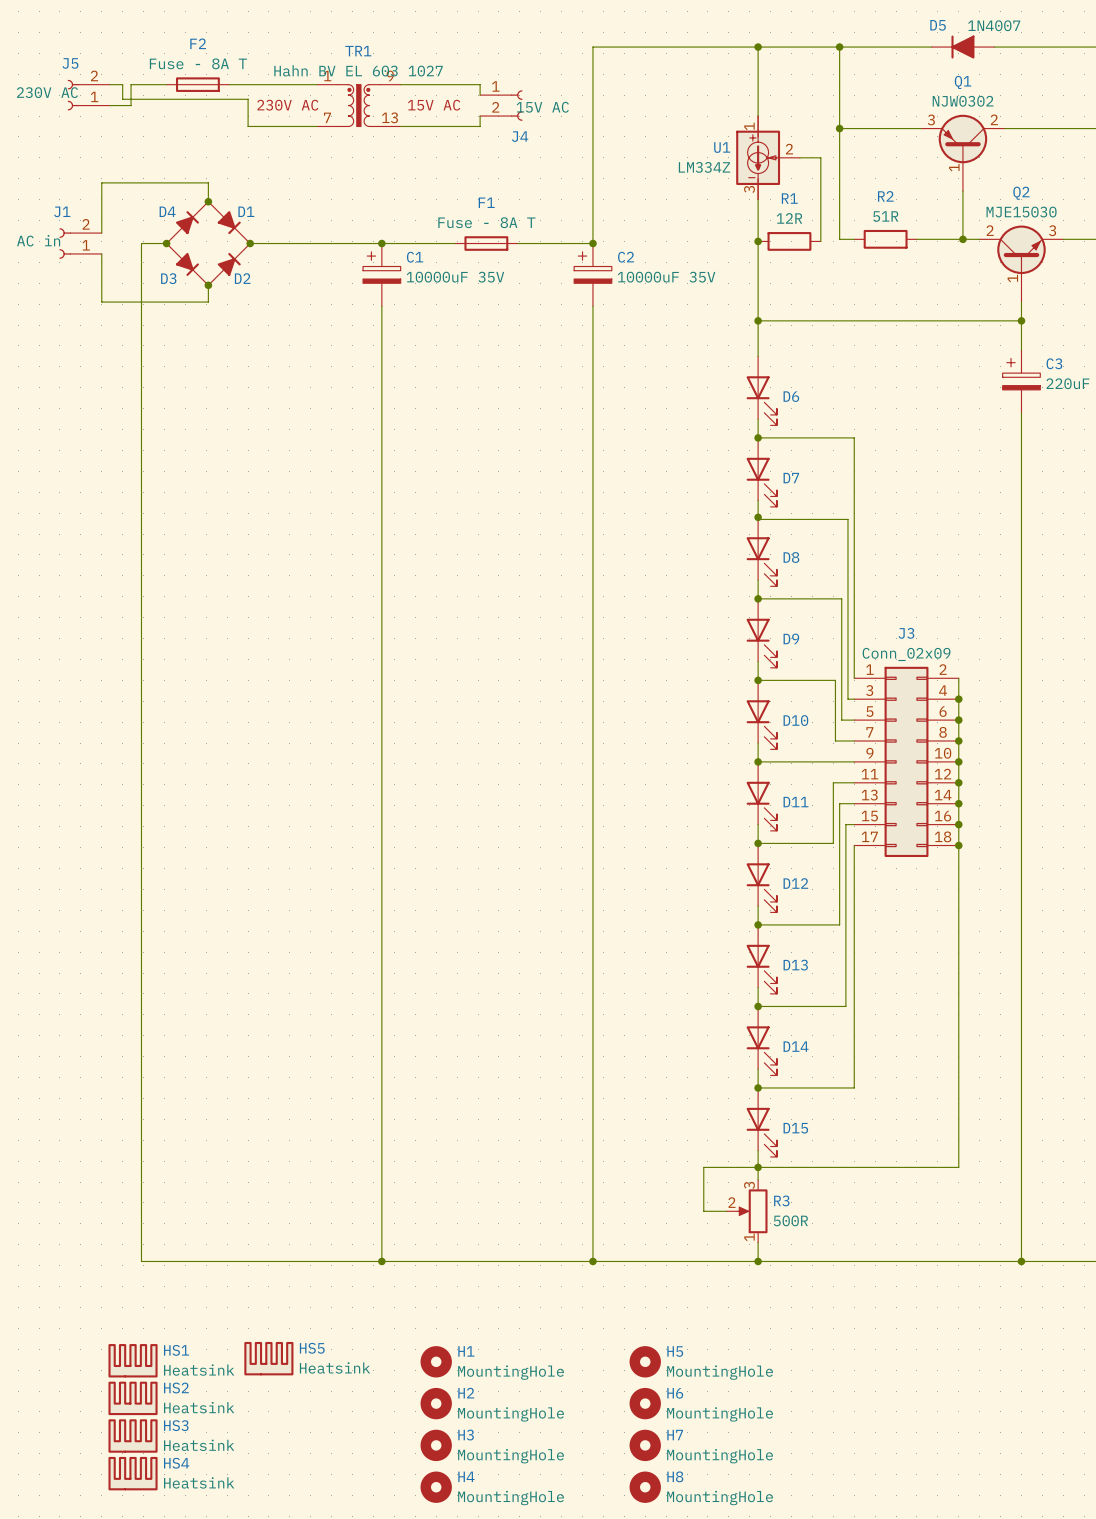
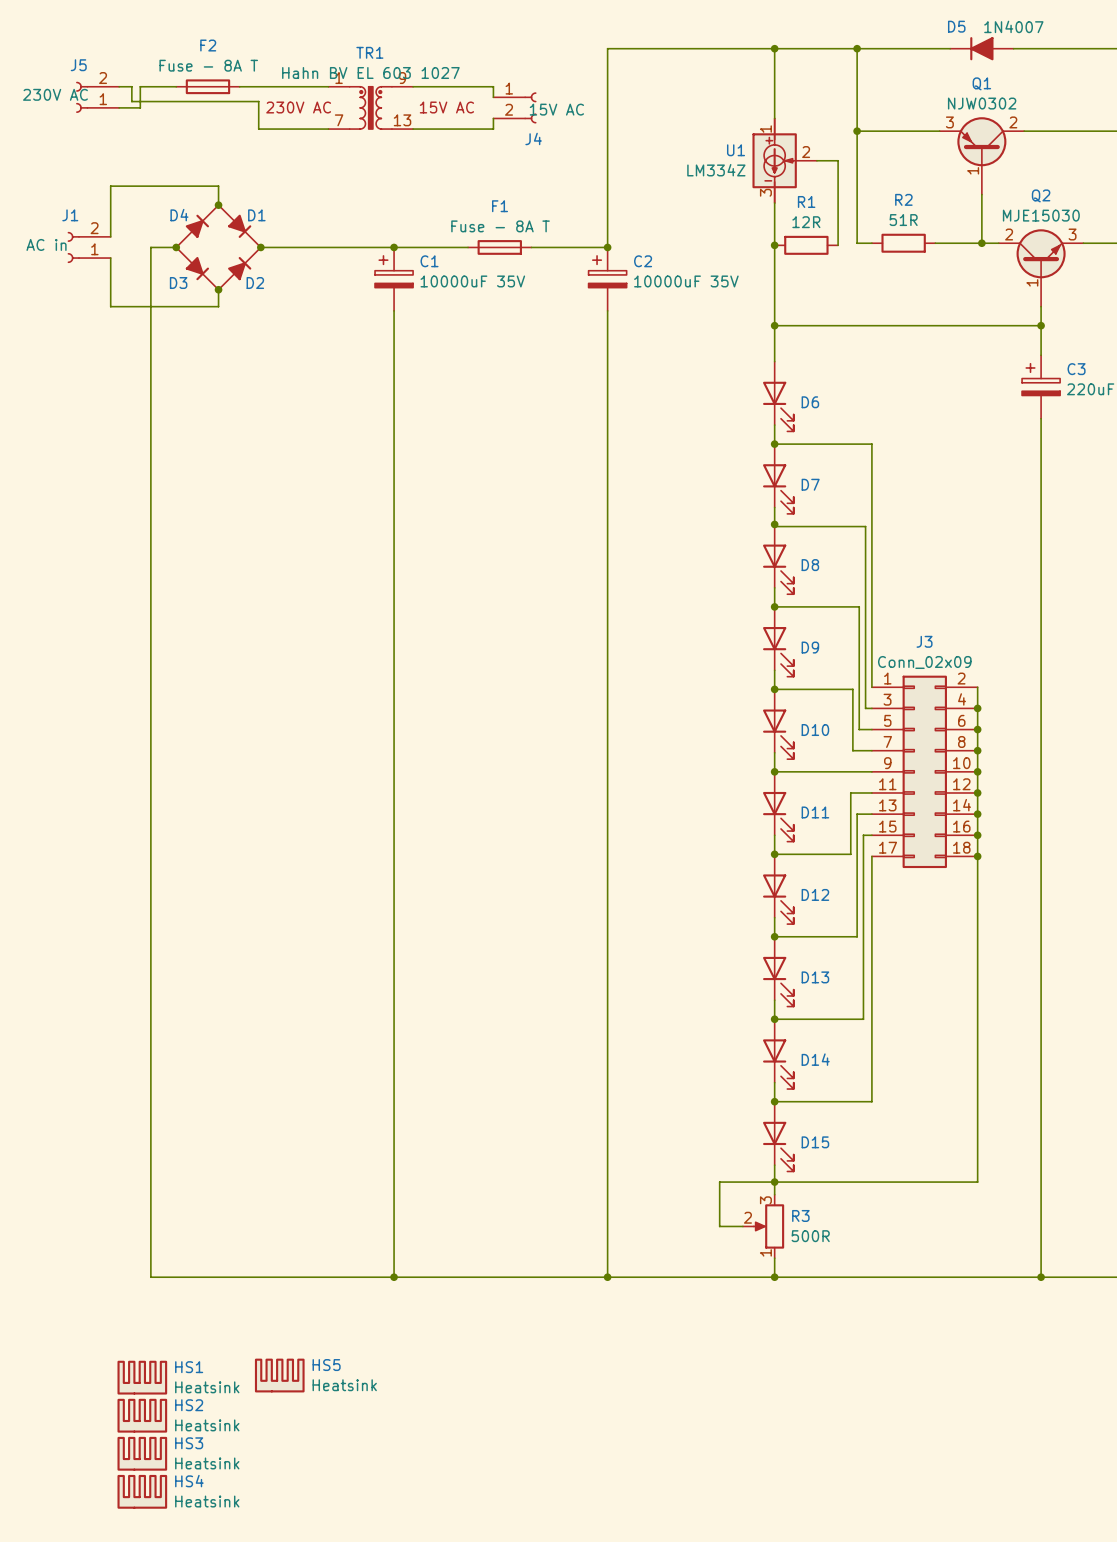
H1: MountingHole (436, 1361) -> none
H5: MountingHole (645, 1361) -> none
H2: MountingHole (436, 1403) -> none
H6: MountingHole (645, 1403) -> none
H3: MountingHole (436, 1445) -> none
H7: MountingHole (645, 1445) -> none
H4: MountingHole (436, 1487) -> none
H8: MountingHole (645, 1487) -> none

